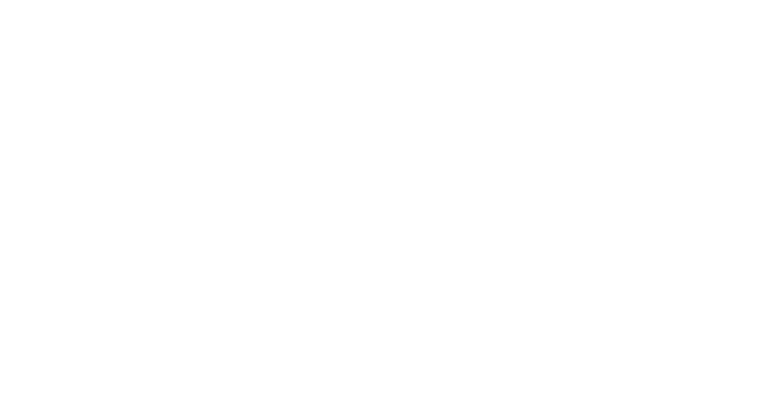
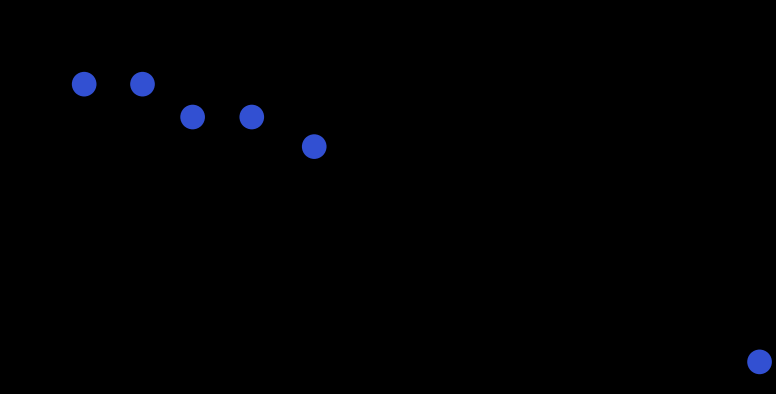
part: none -> (84, 84)
part: none -> (142, 84)
part: none -> (192, 117)
part: none -> (251, 117)
part: none -> (314, 146)
part: none -> (759, 361)

